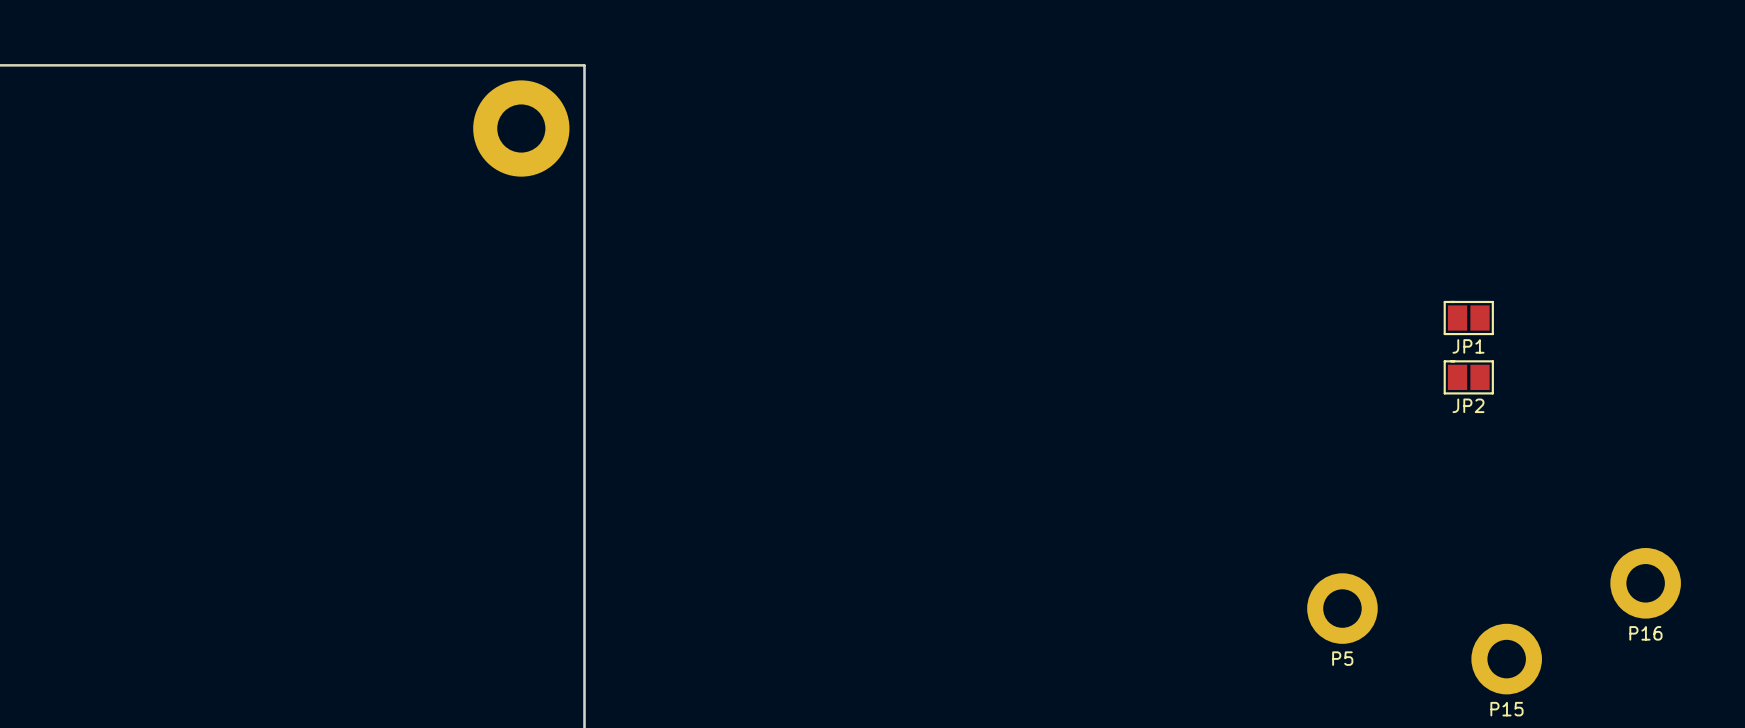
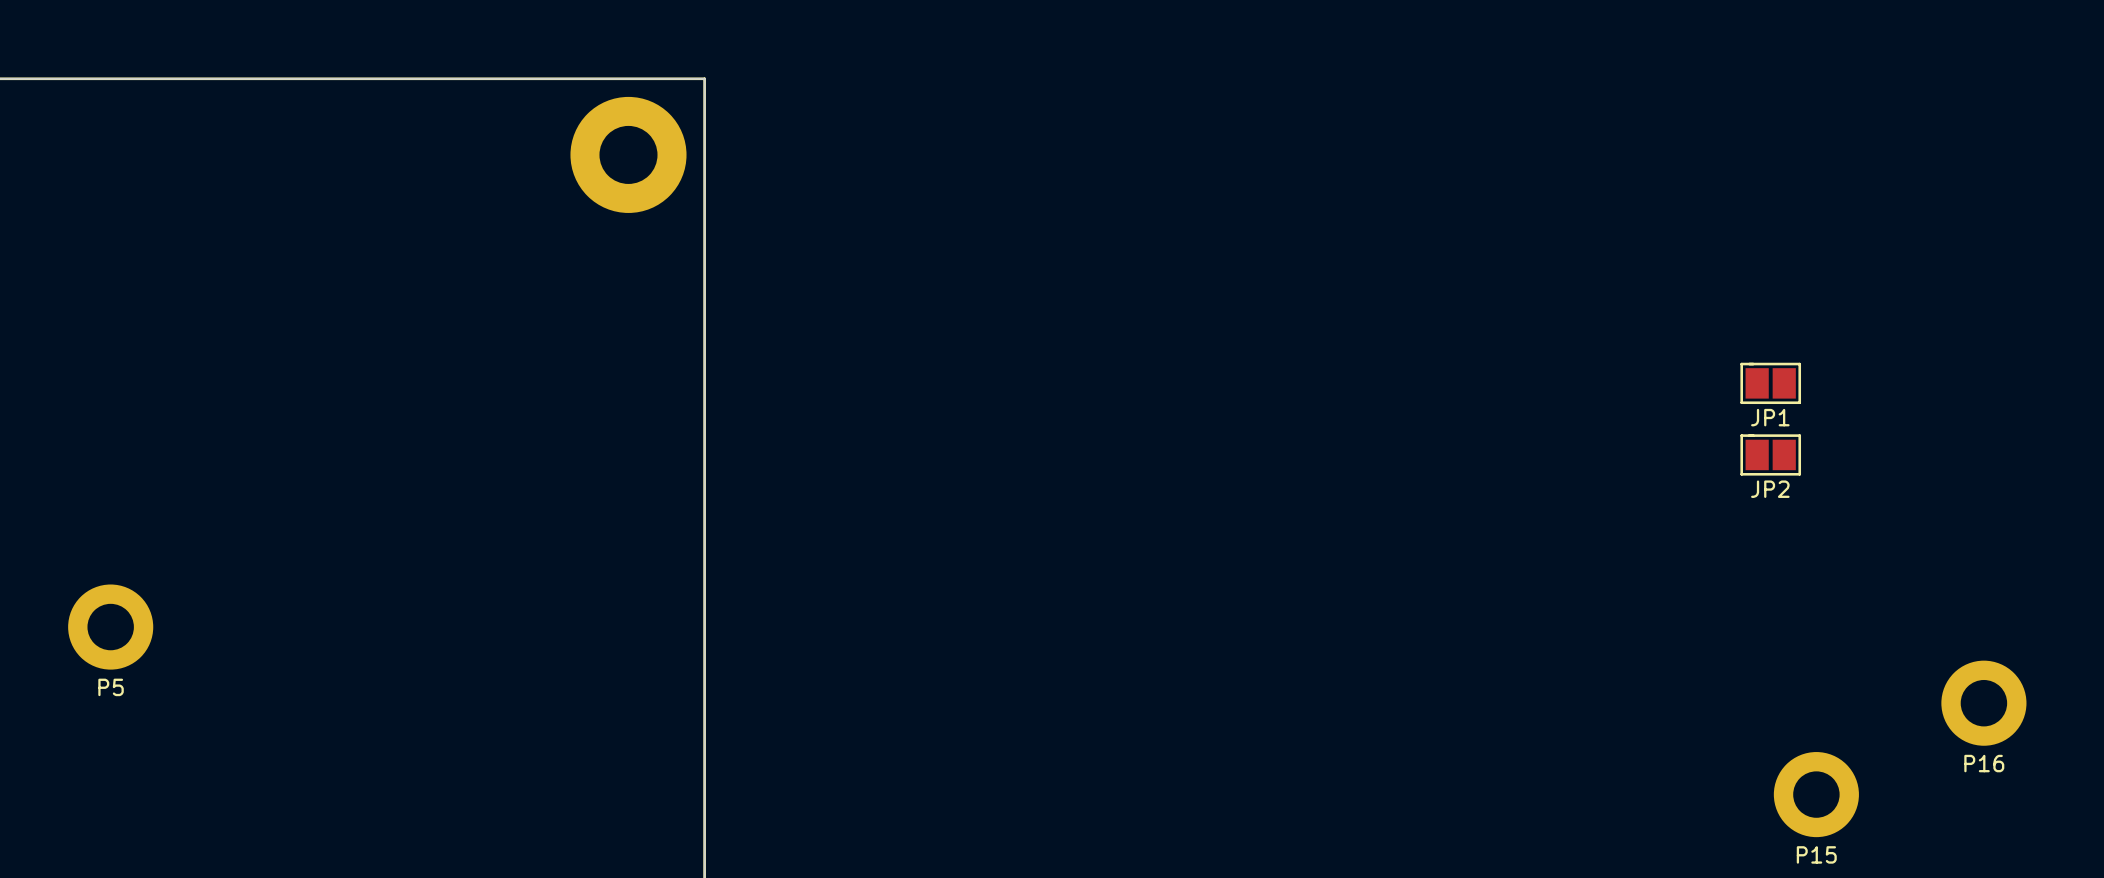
P5 position: (1342, 608) -> (110, 627)

